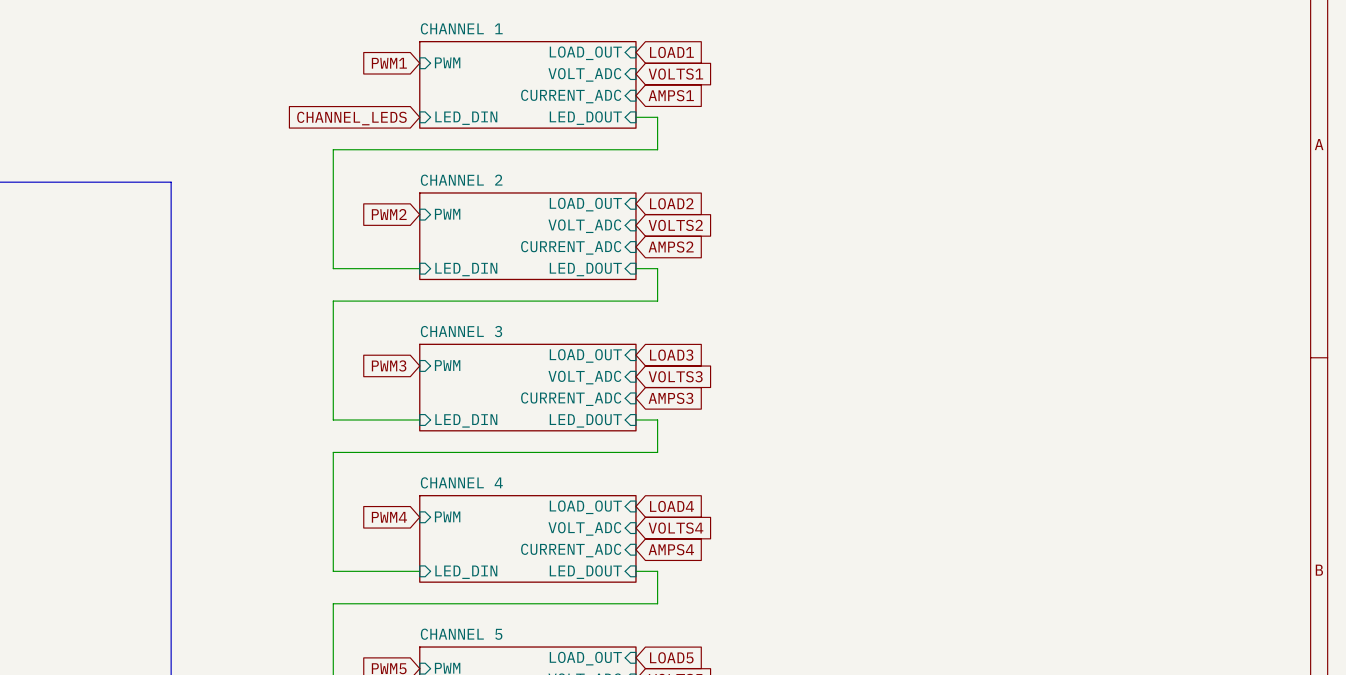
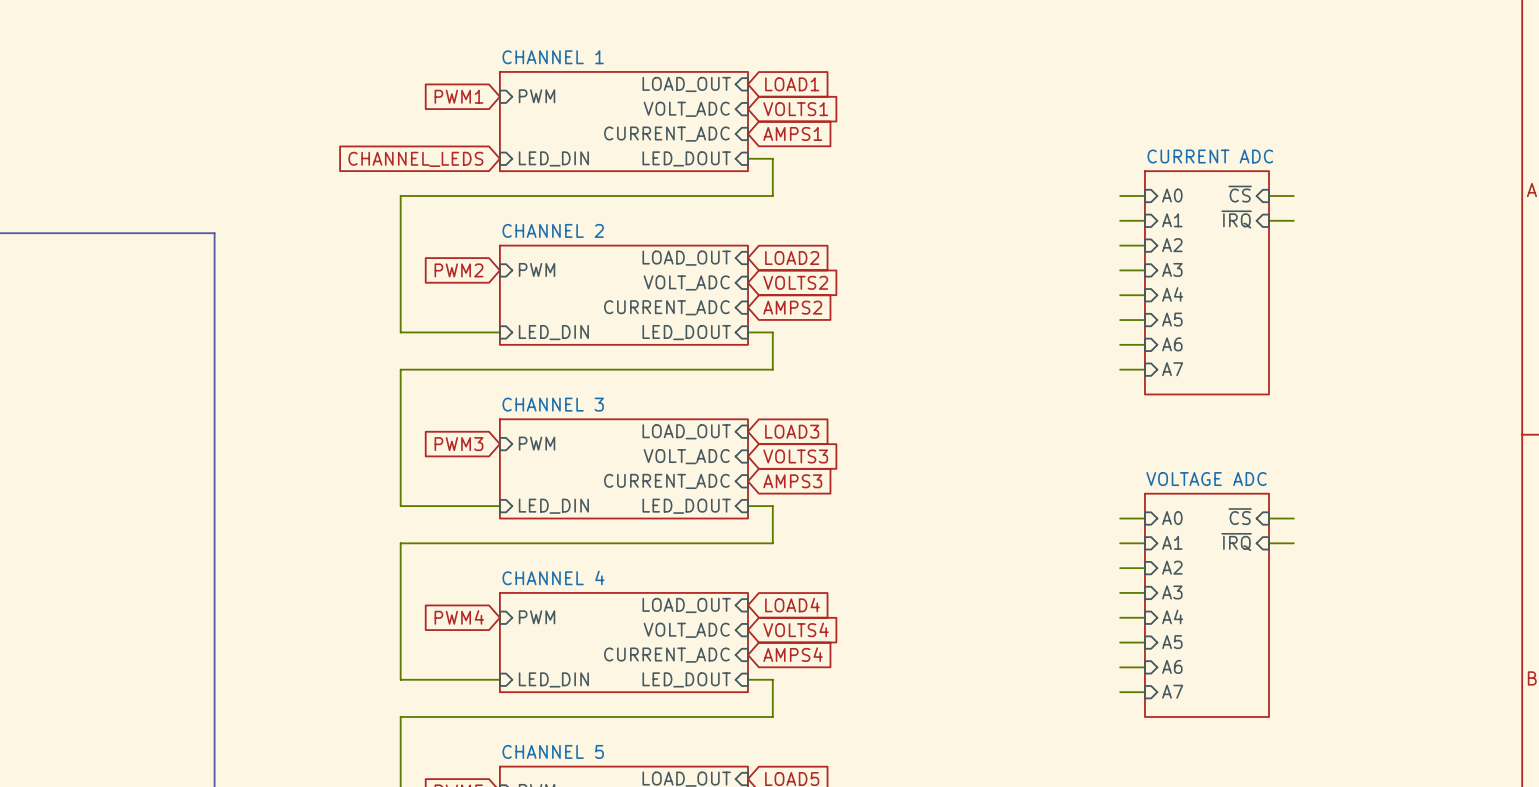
sheet pin: none -> ~{CS} (1240, 194)
wire: none -> (1120, 195) (1144, 195)
sheet pin: none -> A0 (1172, 195)
wire: none -> (1269, 195) (1293, 195)
sheet pin: none -> A1 (1172, 220)
sheet pin: none -> ~{IRQ} (1236, 219)
wire: none -> (1120, 220) (1144, 220)
wire: none -> (1269, 220) (1293, 220)
wire: none -> (1120, 245) (1144, 245)
sheet pin: none -> A2 (1172, 245)
wire: none -> (1120, 270) (1144, 270)
sheet pin: none -> A3 (1172, 269)
sheet CURRENT ADC: none -> (1206, 282)
sheet pin: none -> A4 (1172, 294)
wire: none -> (1120, 295) (1144, 295)
wire: none -> (1120, 320) (1144, 320)
sheet pin: none -> A5 (1172, 319)
wire: none -> (1120, 344) (1144, 344)
sheet pin: none -> A6 (1172, 344)
sheet pin: none -> A7 (1172, 369)
wire: none -> (1120, 369) (1144, 369)
sheet pin: none -> ~{CS} (1240, 516)
wire: none -> (1120, 518) (1144, 518)
sheet pin: none -> A0 (1172, 518)
wire: none -> (1269, 518) (1293, 518)
wire: none -> (1120, 543) (1144, 543)
sheet pin: none -> A1 (1172, 542)
sheet pin: none -> ~{IRQ} (1236, 542)
wire: none -> (1269, 543) (1293, 543)
sheet pin: none -> A2 (1172, 567)
wire: none -> (1120, 568) (1144, 568)
wire: none -> (1120, 592) (1144, 592)
sheet pin: none -> A3 (1172, 592)
sheet VOLTAGE ADC: none -> (1206, 605)
sheet pin: none -> A4 (1172, 616)
wire: none -> (1120, 617) (1144, 617)
wire: none -> (1120, 642) (1144, 642)
sheet pin: none -> A5 (1172, 642)
wire: none -> (1120, 667) (1144, 667)
sheet pin: none -> A6 (1172, 666)
sheet pin: none -> A7 (1172, 691)
wire: none -> (1120, 692) (1144, 692)

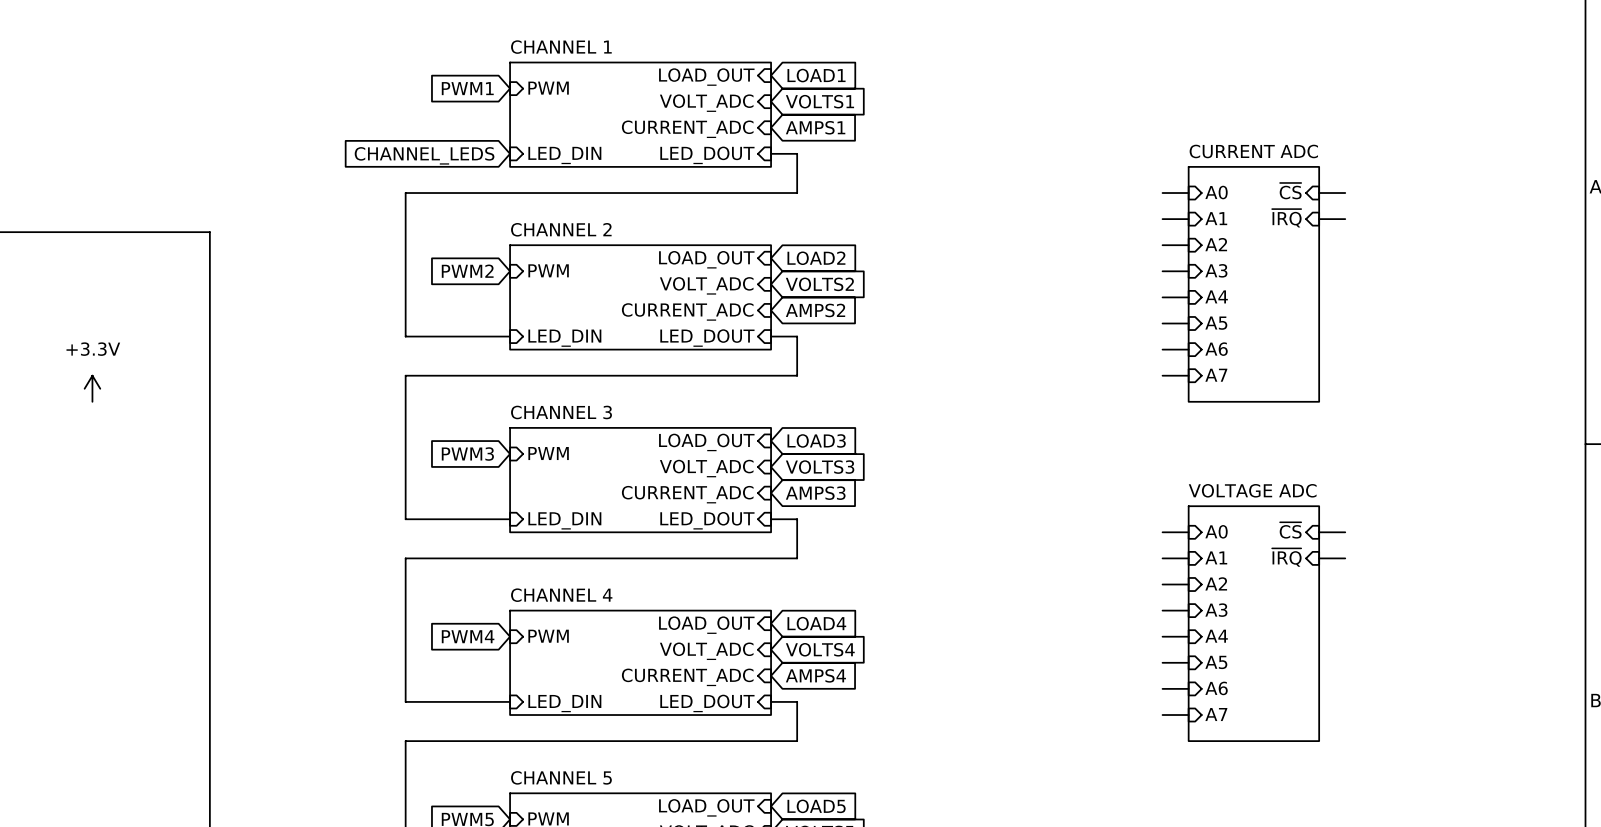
power symbol: none -> +3.3V (92, 388)

